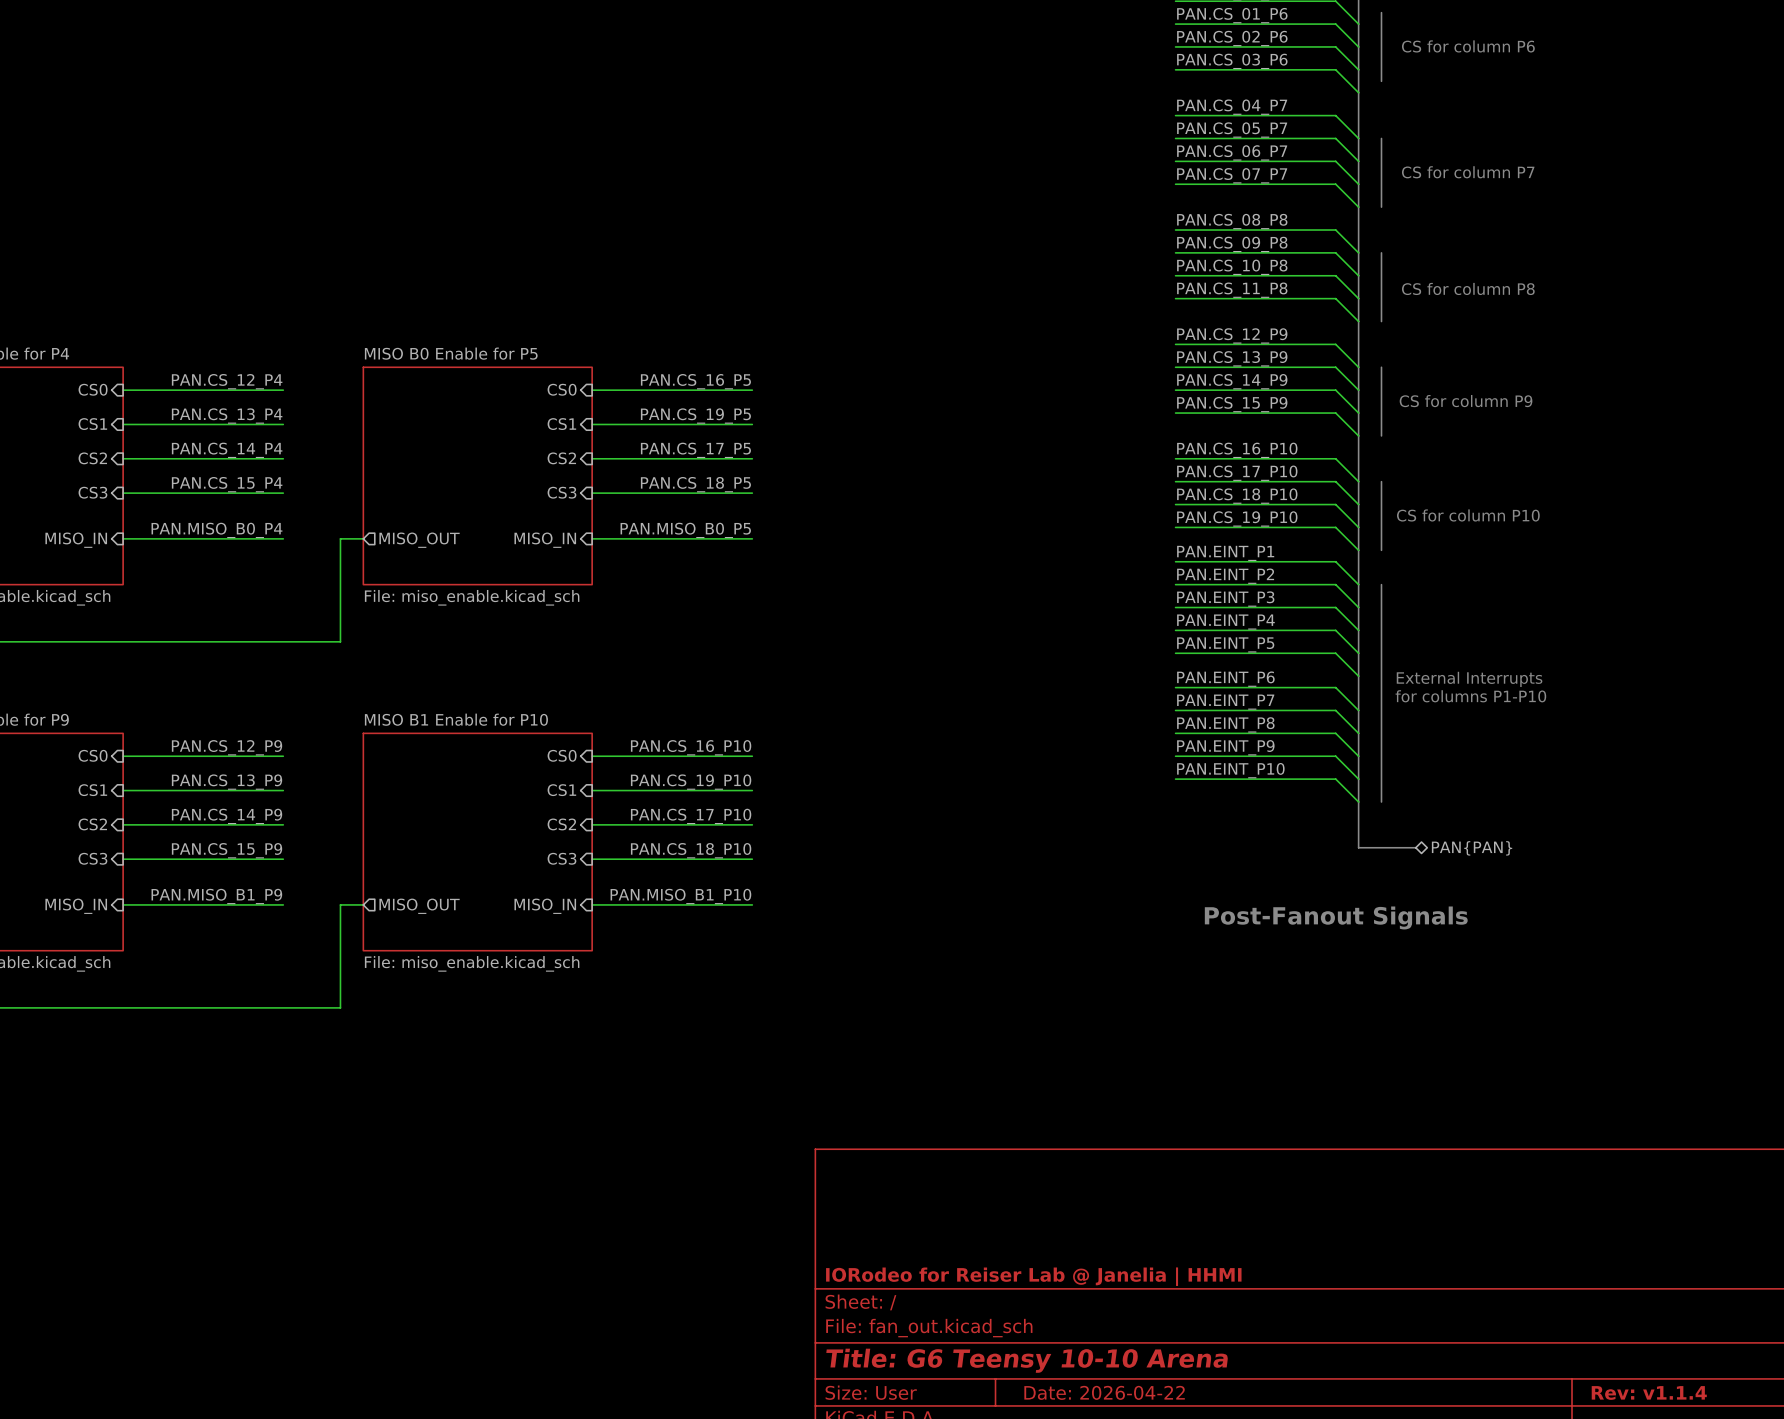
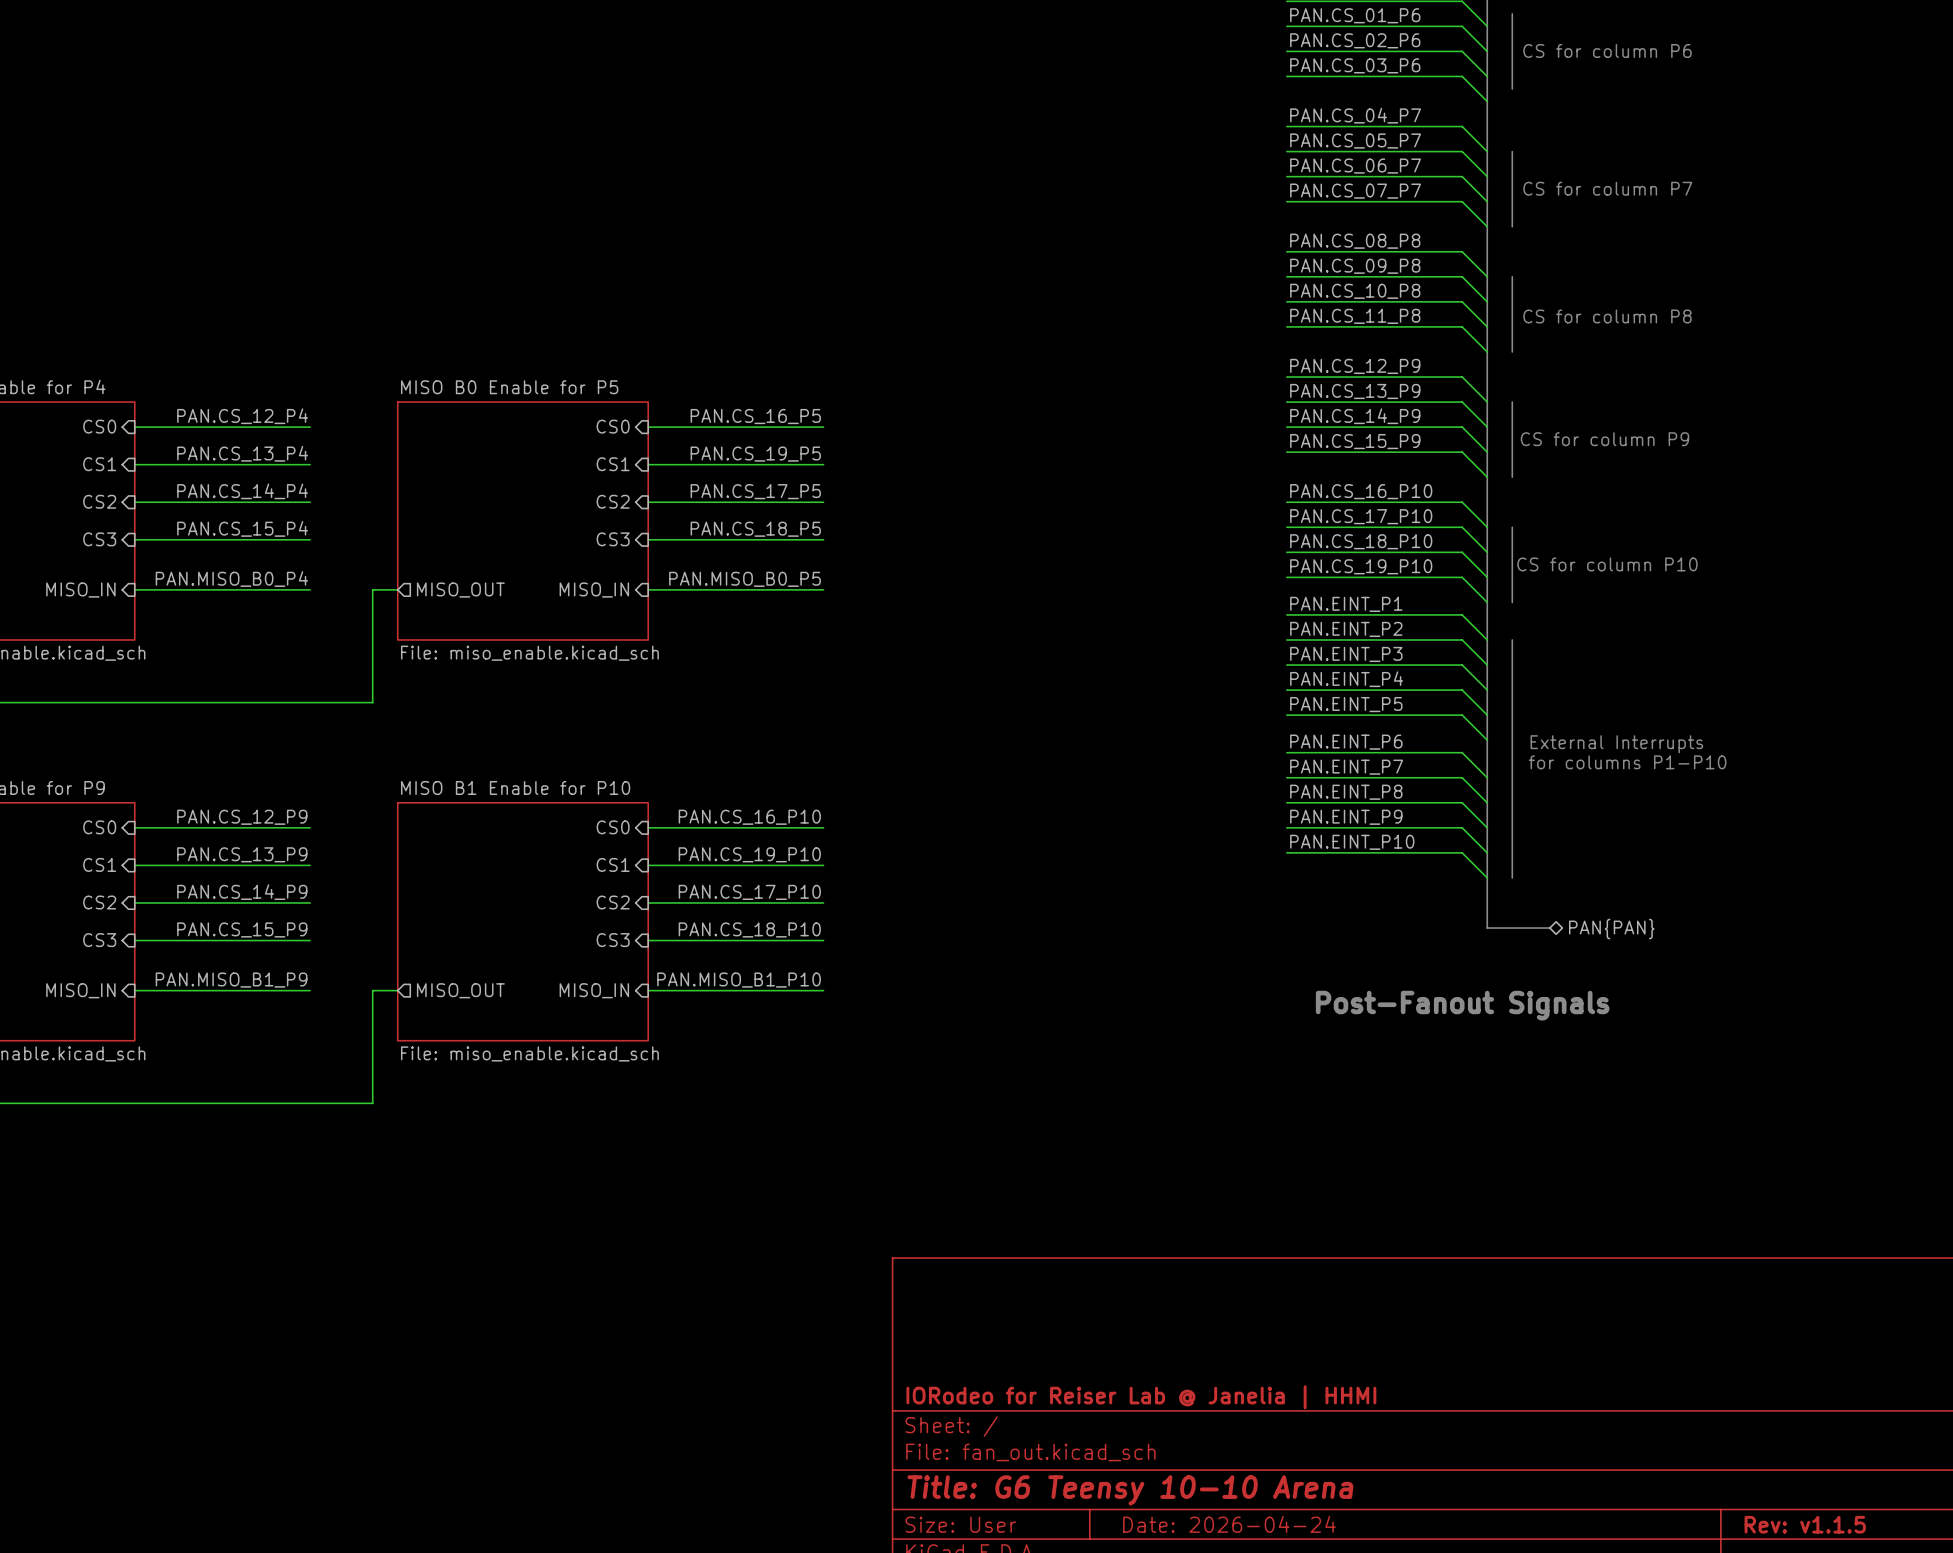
title block: Date: 2026-04-22 (1104, 1392) -> Date: 2026-04-24 (1229, 1524)
title block: Rev: v1.1.4 (1649, 1392) -> Rev: v1.1.5 (1805, 1524)

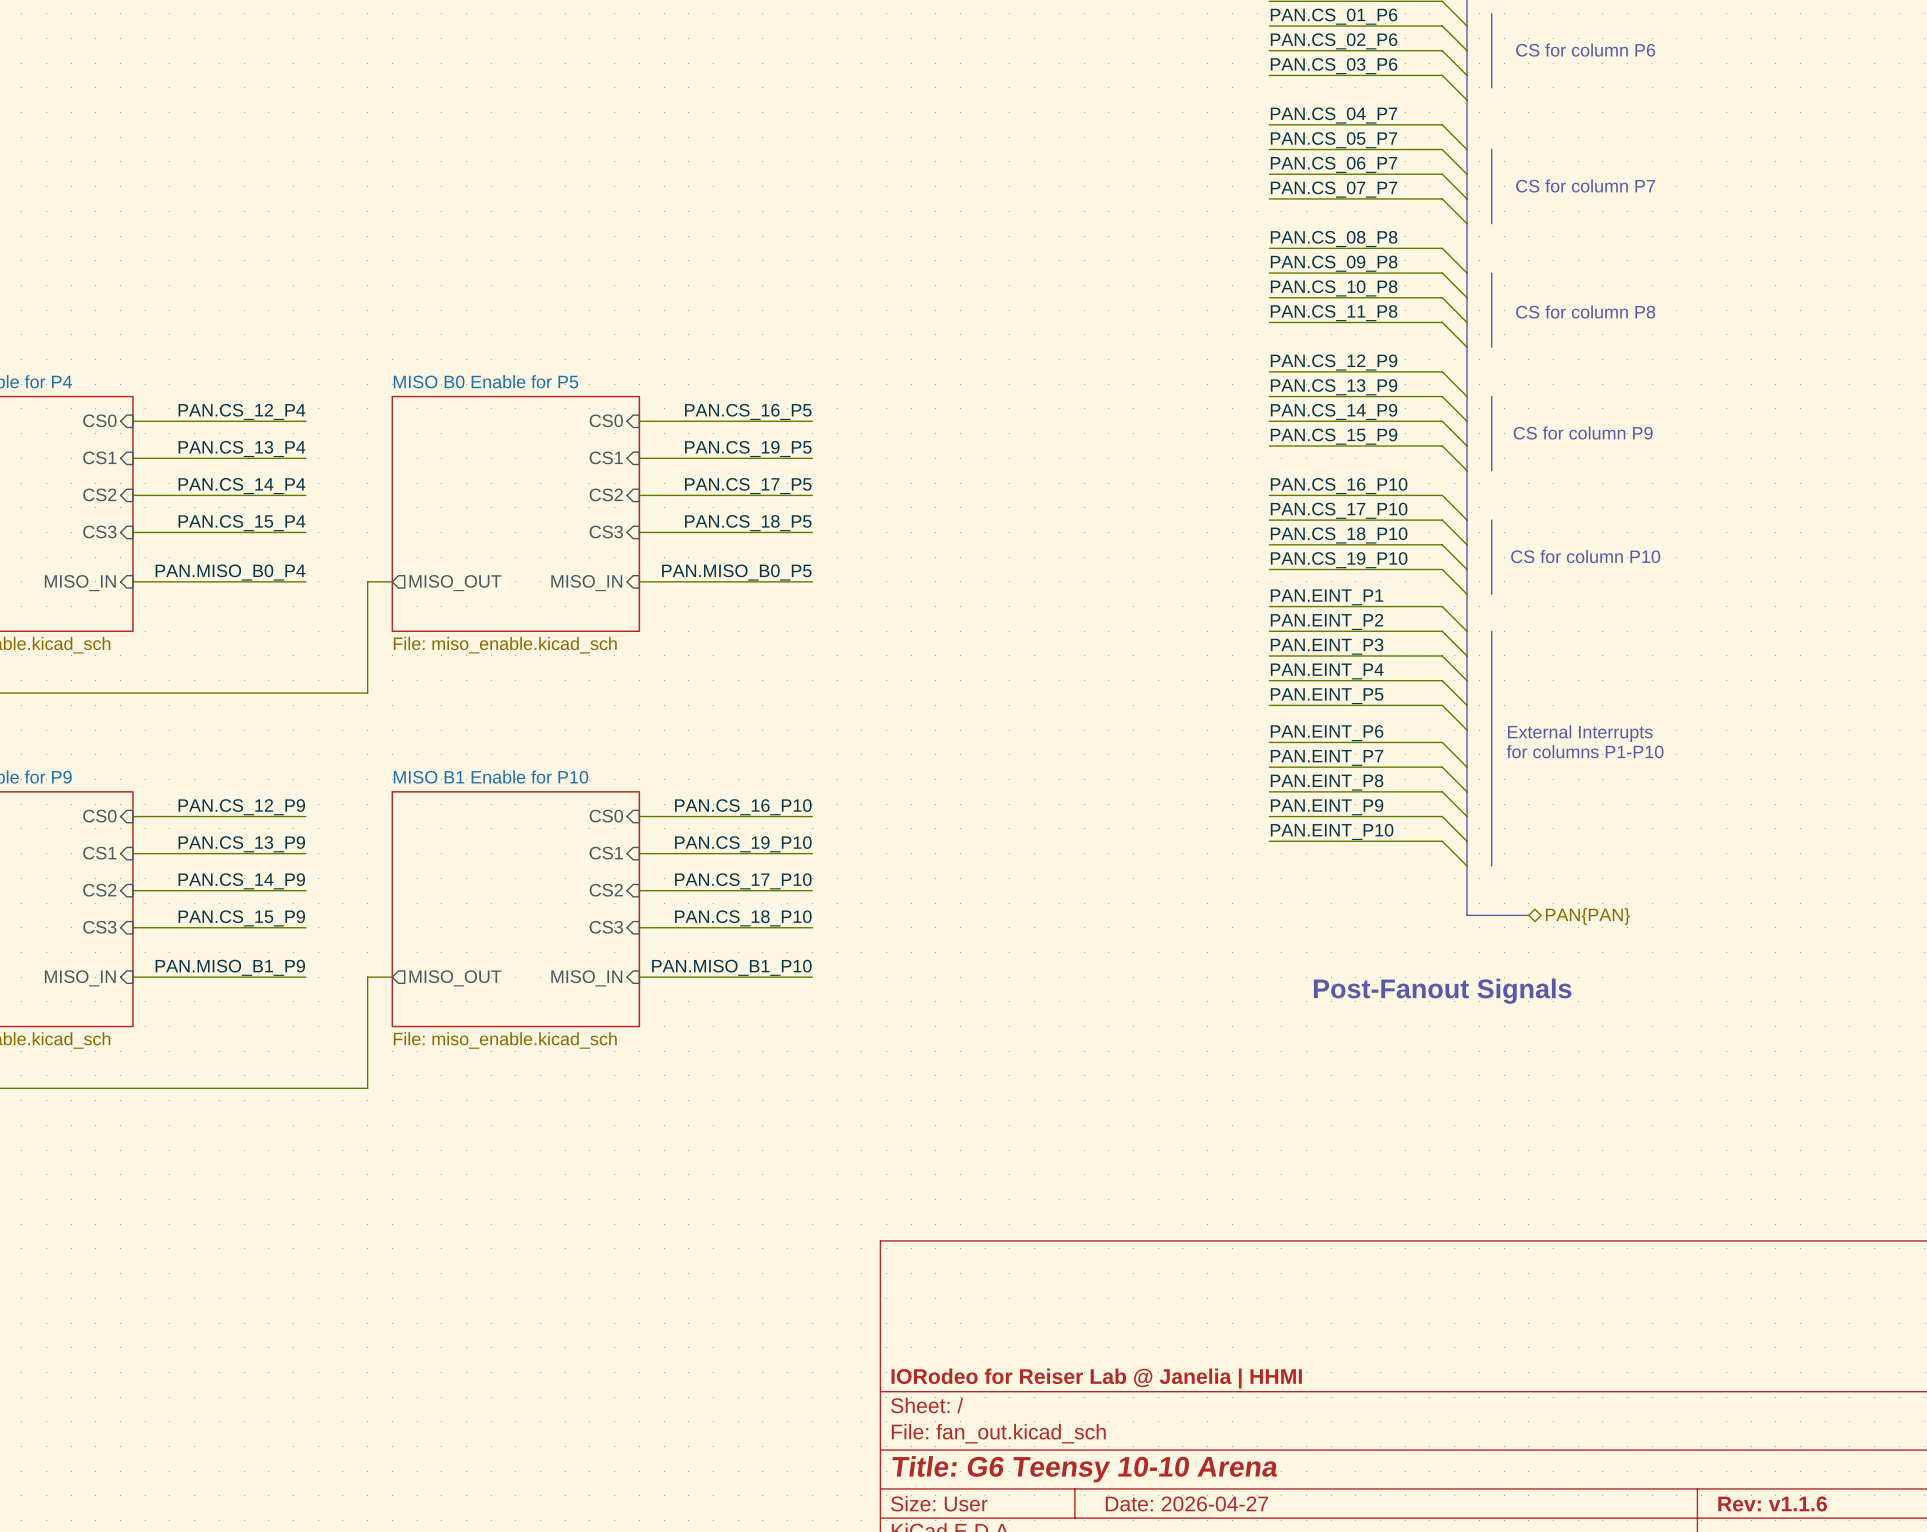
title block: Date: 2026-04-24 (1229, 1524) -> Date: 2026-04-27 (1186, 1503)
title block: Rev: v1.1.5 (1805, 1524) -> Rev: v1.1.6 (1772, 1503)

